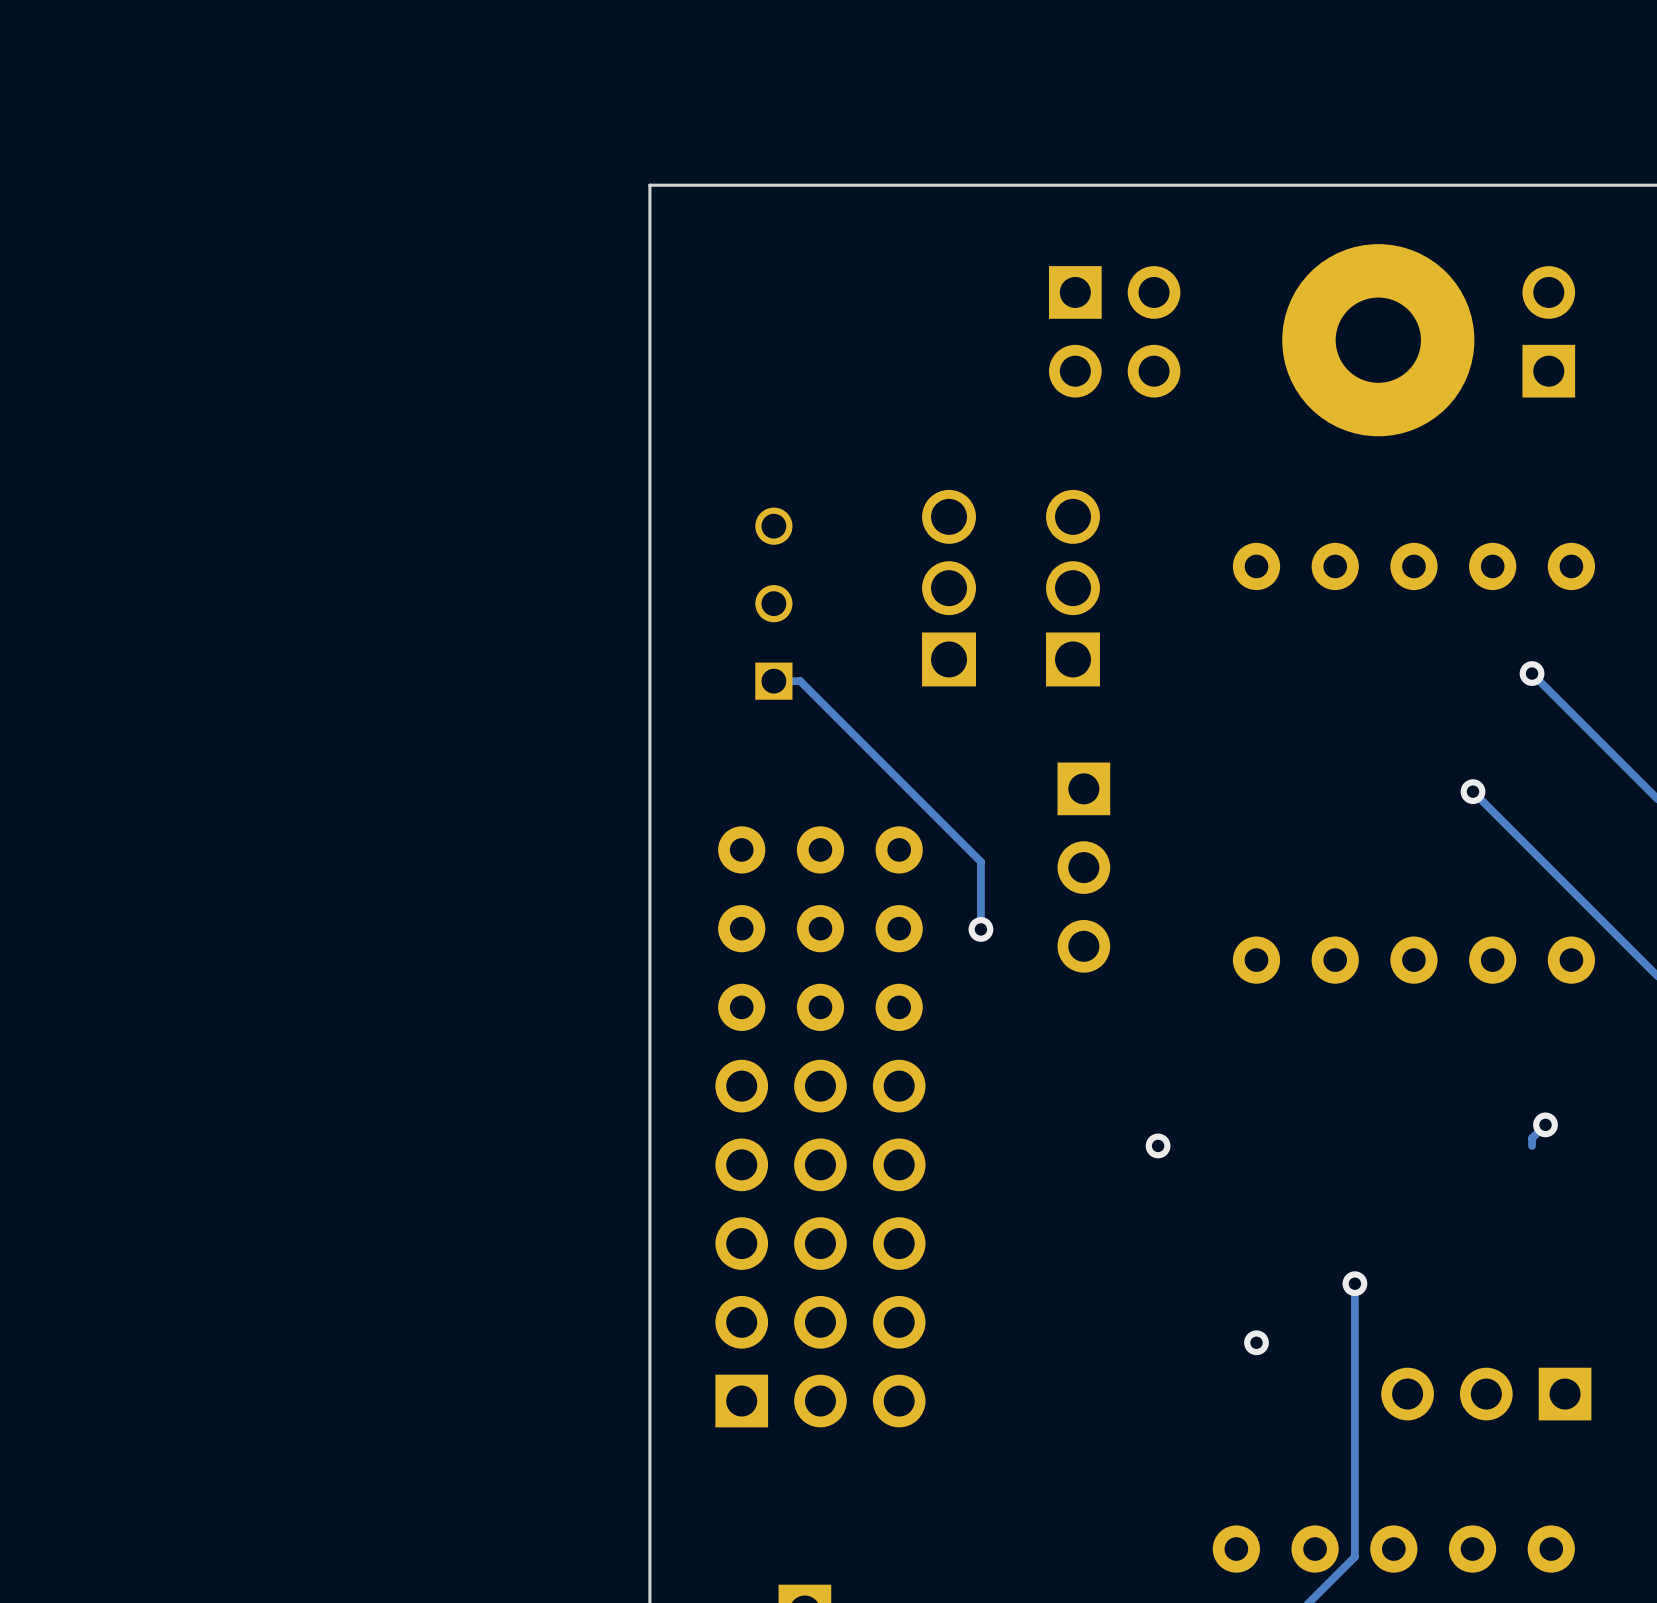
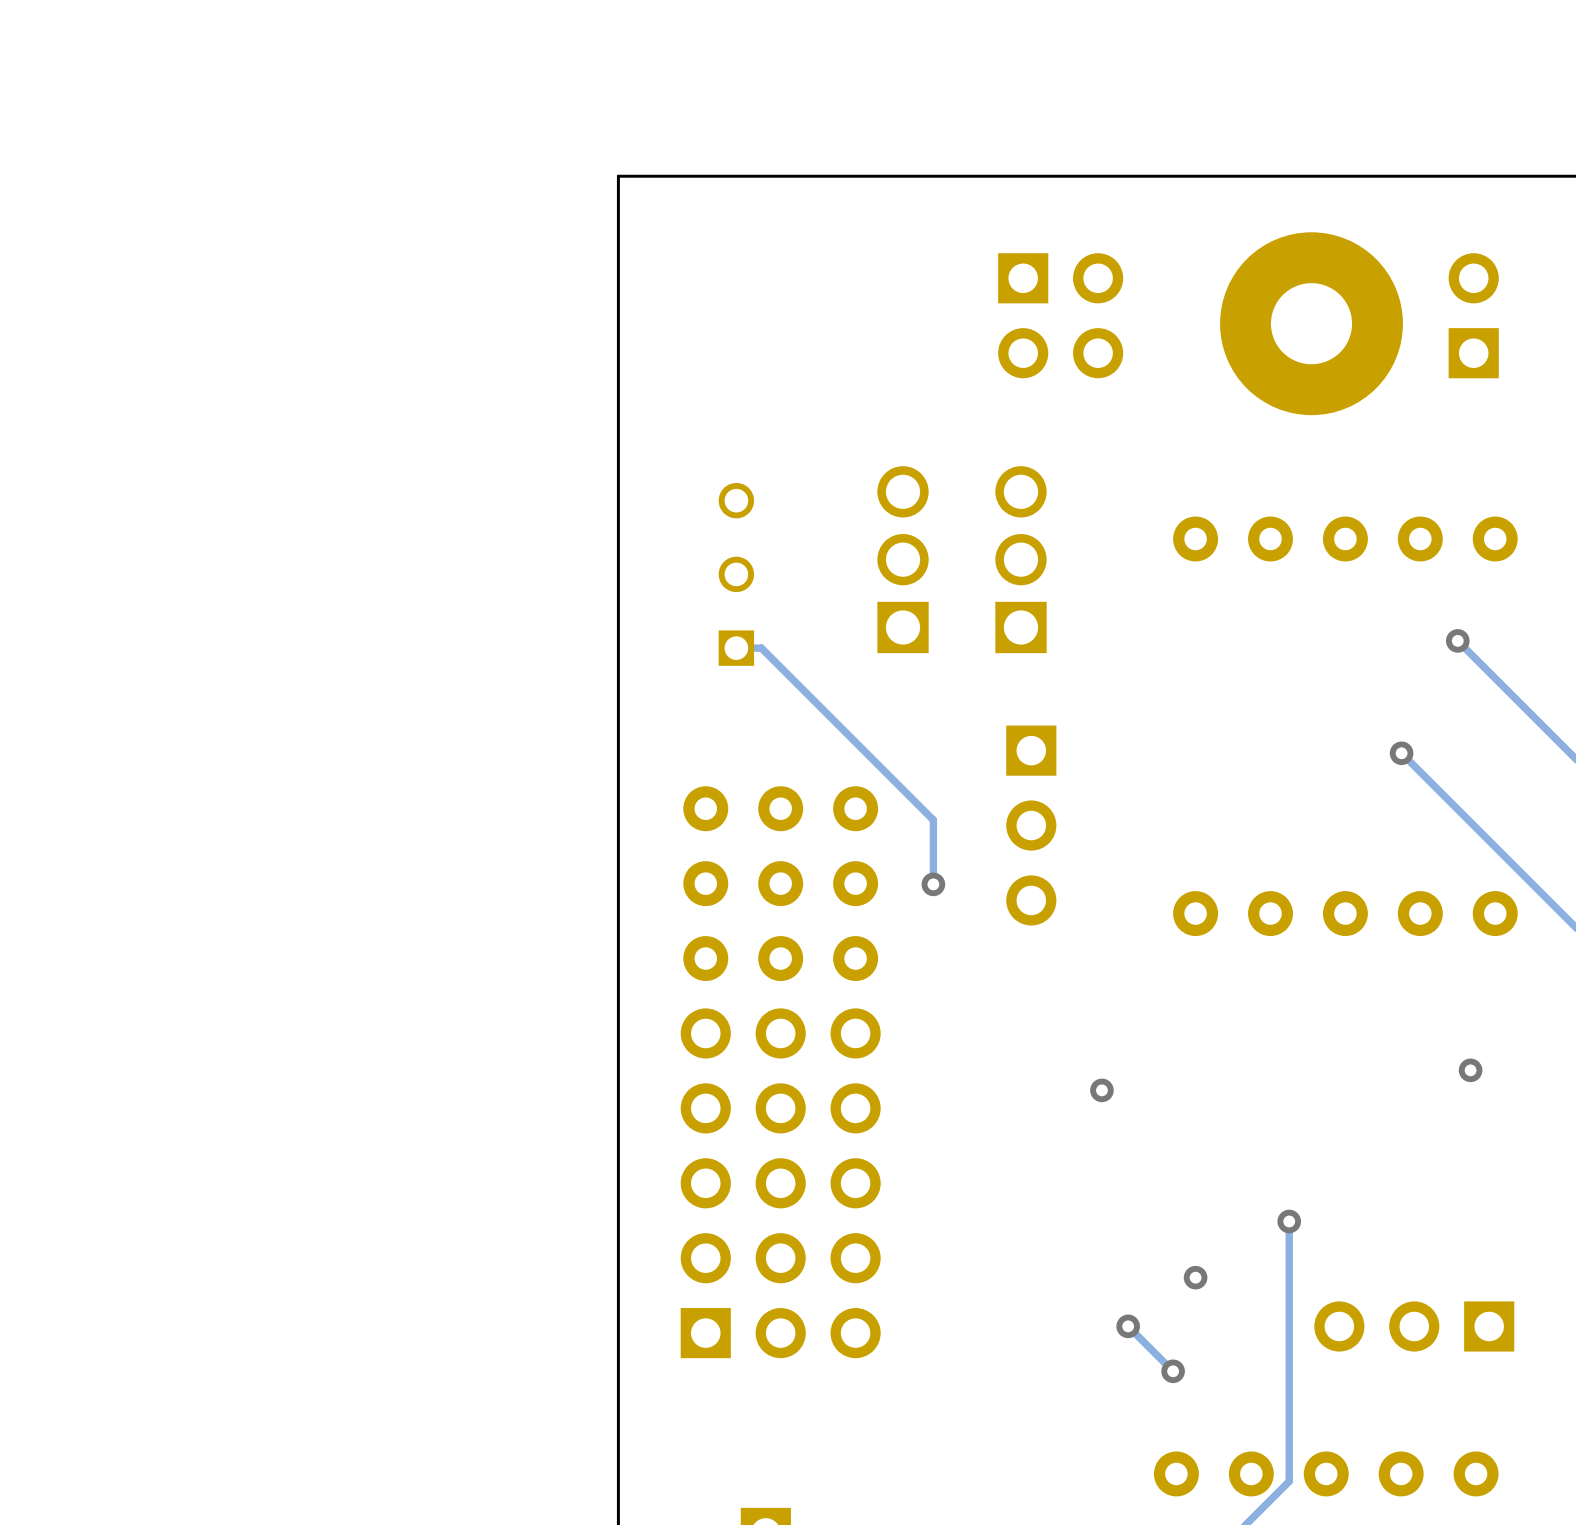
track: (1545, 1124) (1532, 1138) (1532, 1145) -> none
track: none -> (1128, 1326) (1173, 1371)
via: none -> (1128, 1326)
via: none -> (1173, 1371)

